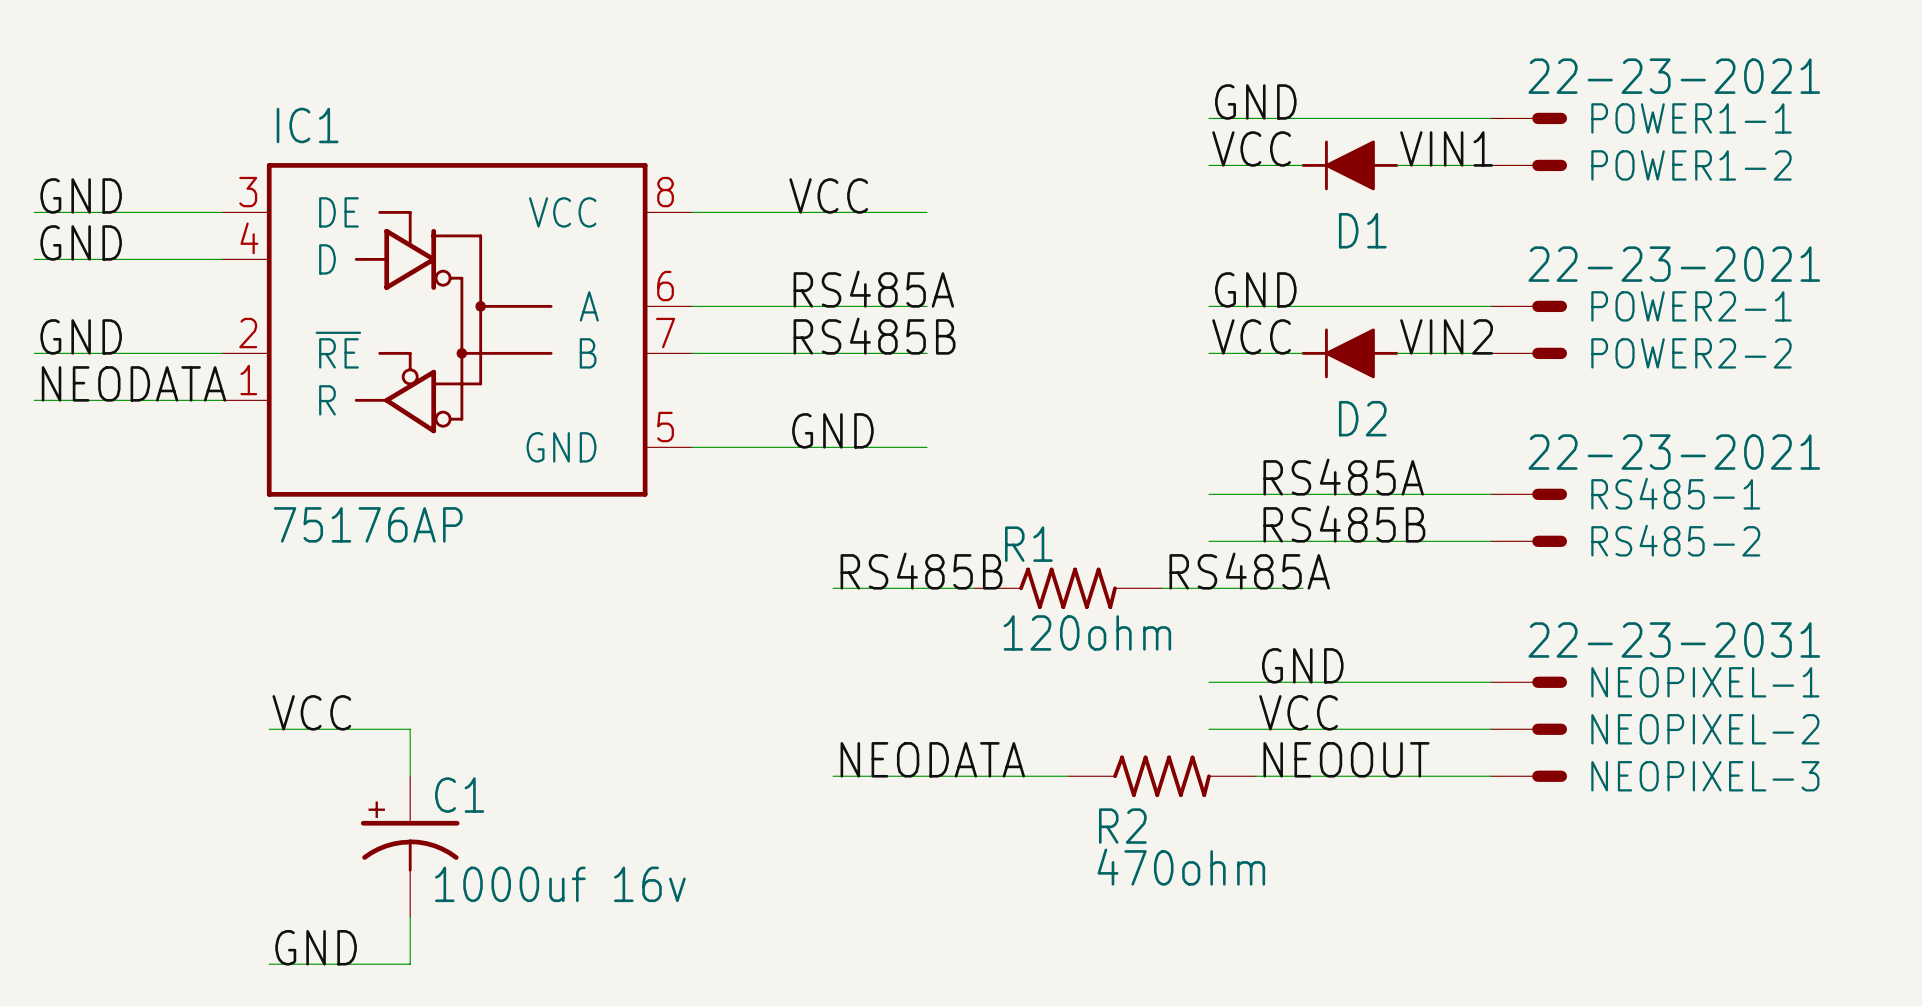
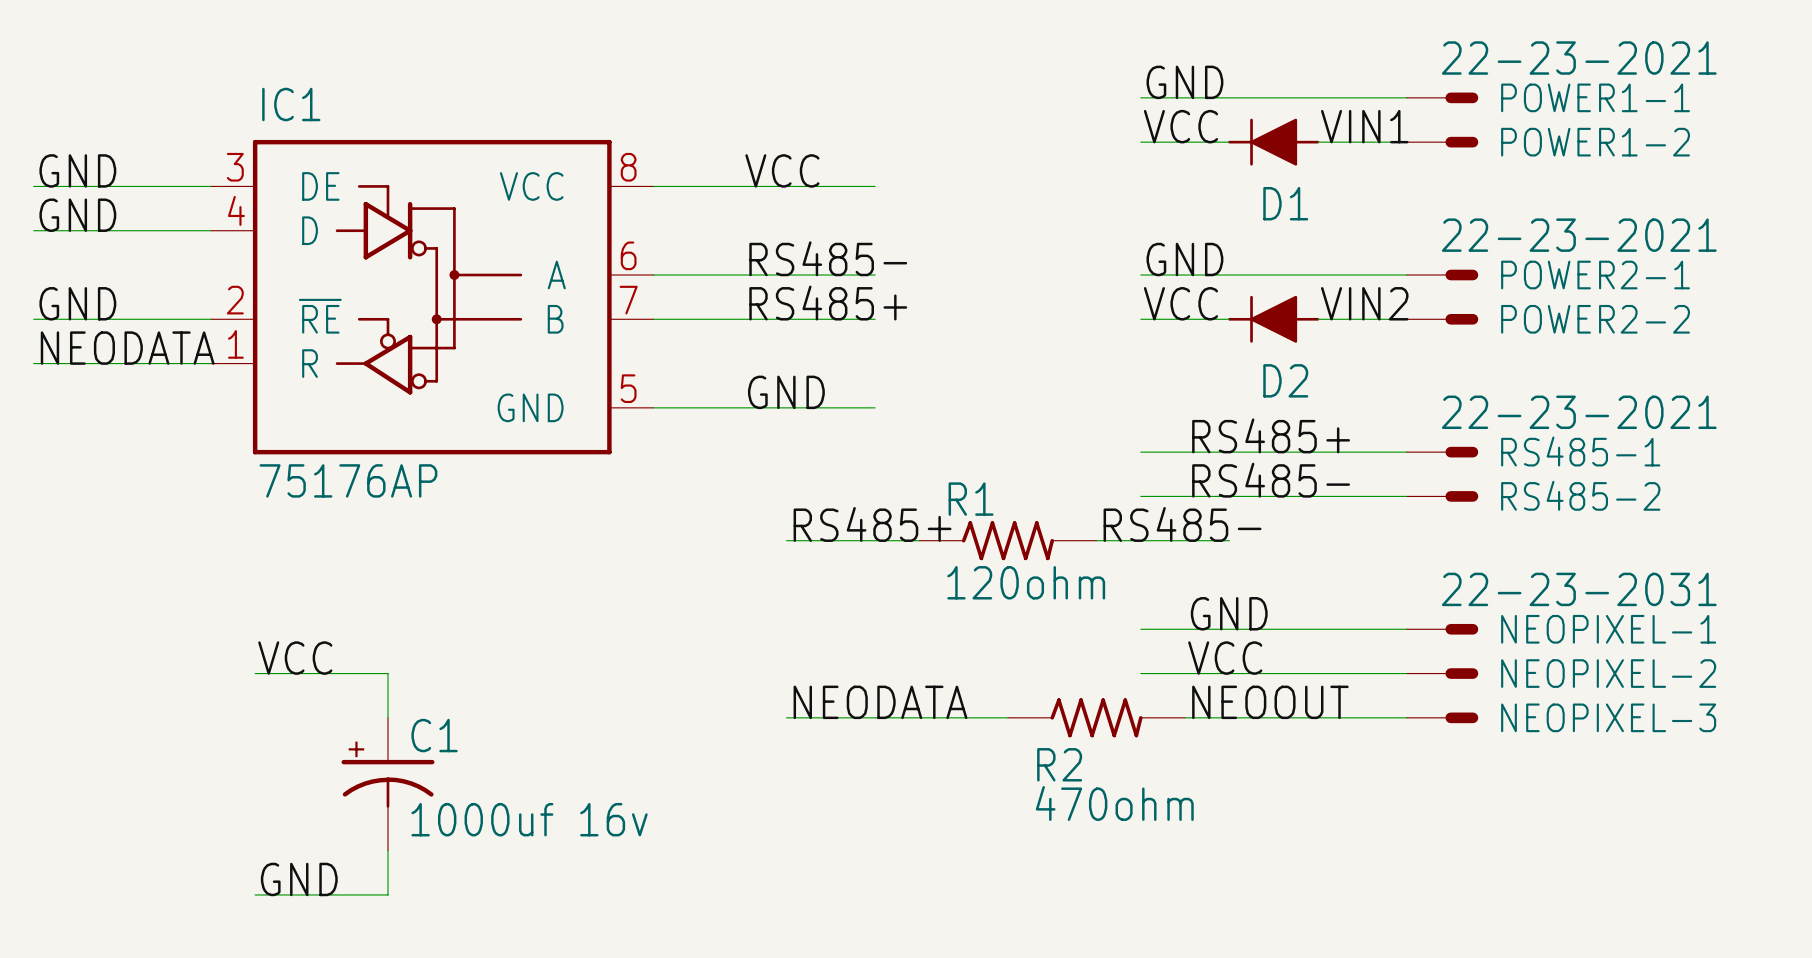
label: RS485A (873, 289) -> RS485- (828, 258)
label: RS485B (874, 336) -> RS485+ (828, 303)
label: RS485A (1343, 477) -> RS485+ (1271, 435)
label: RS485B (1344, 524) -> RS485- (1271, 480)
label: RS485B (921, 571) -> RS485+ (872, 524)
label: RS485A (1249, 571) -> RS485- (1182, 524)

